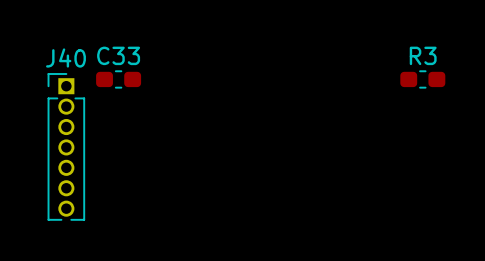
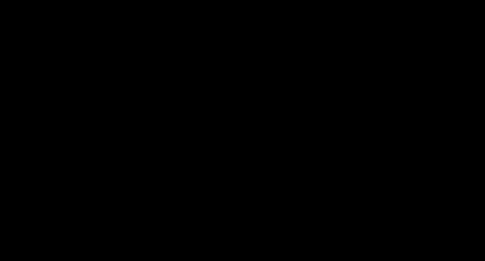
C33: (118, 79) -> none
R3: (422, 79) -> none
J40: (66, 146) -> none

